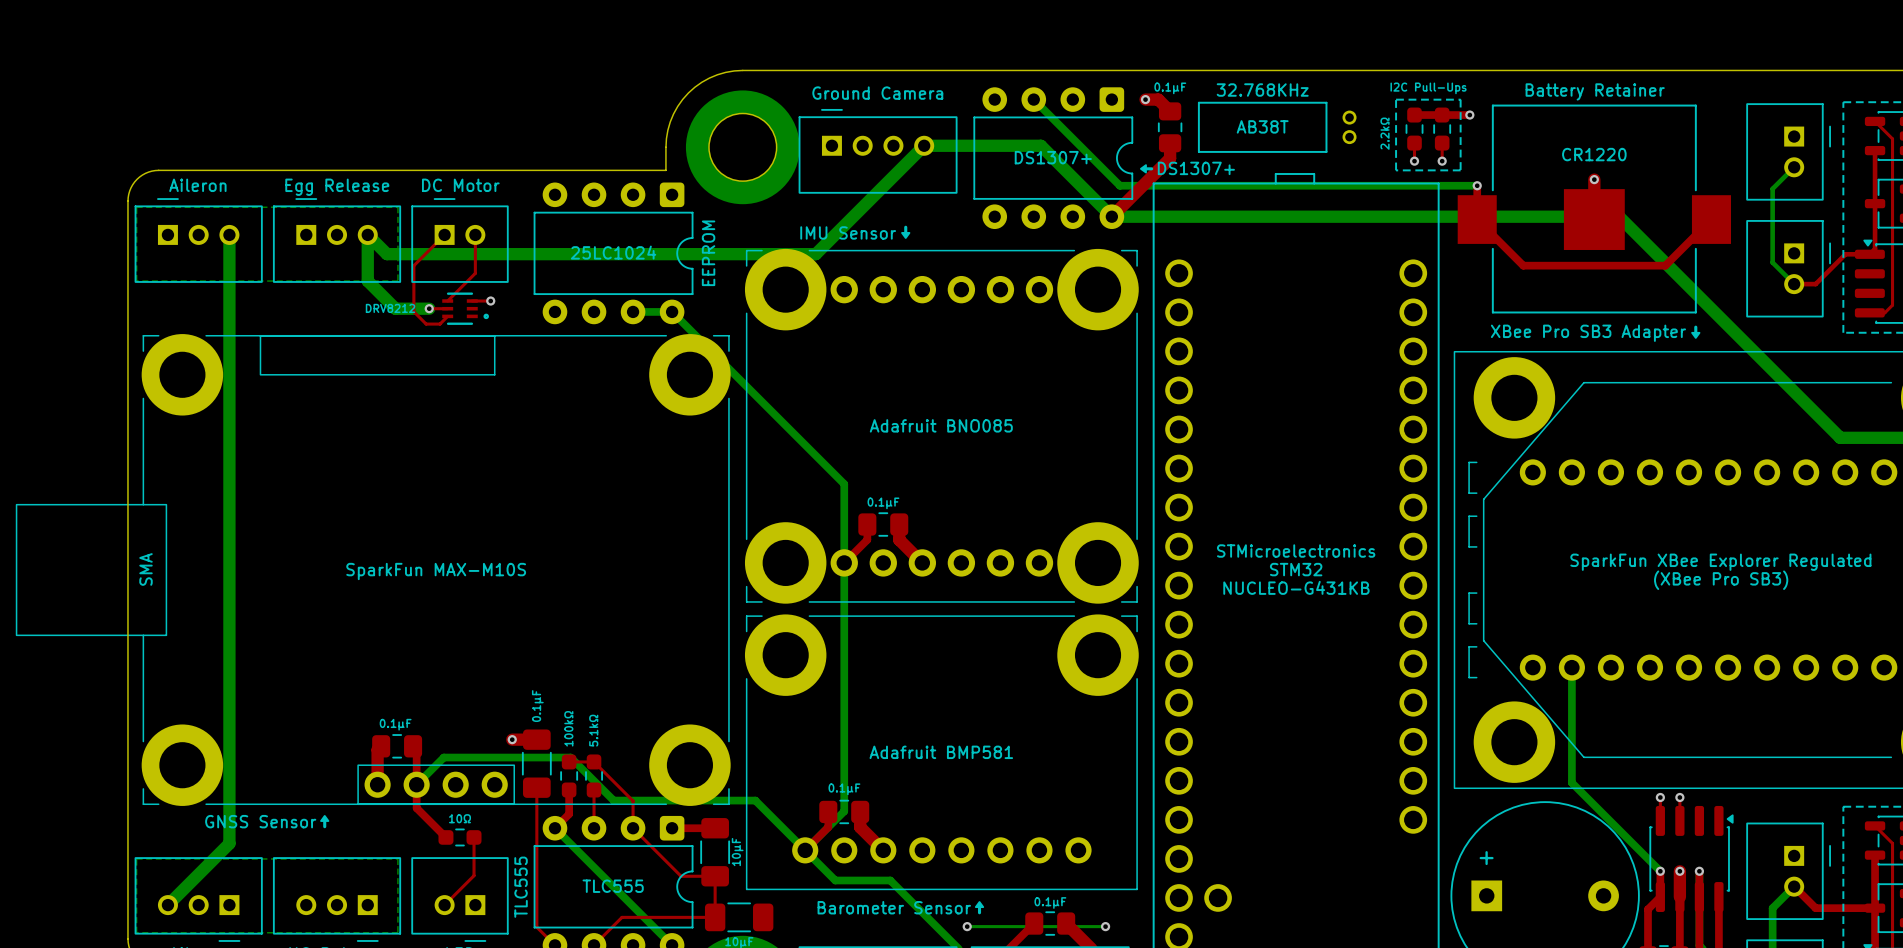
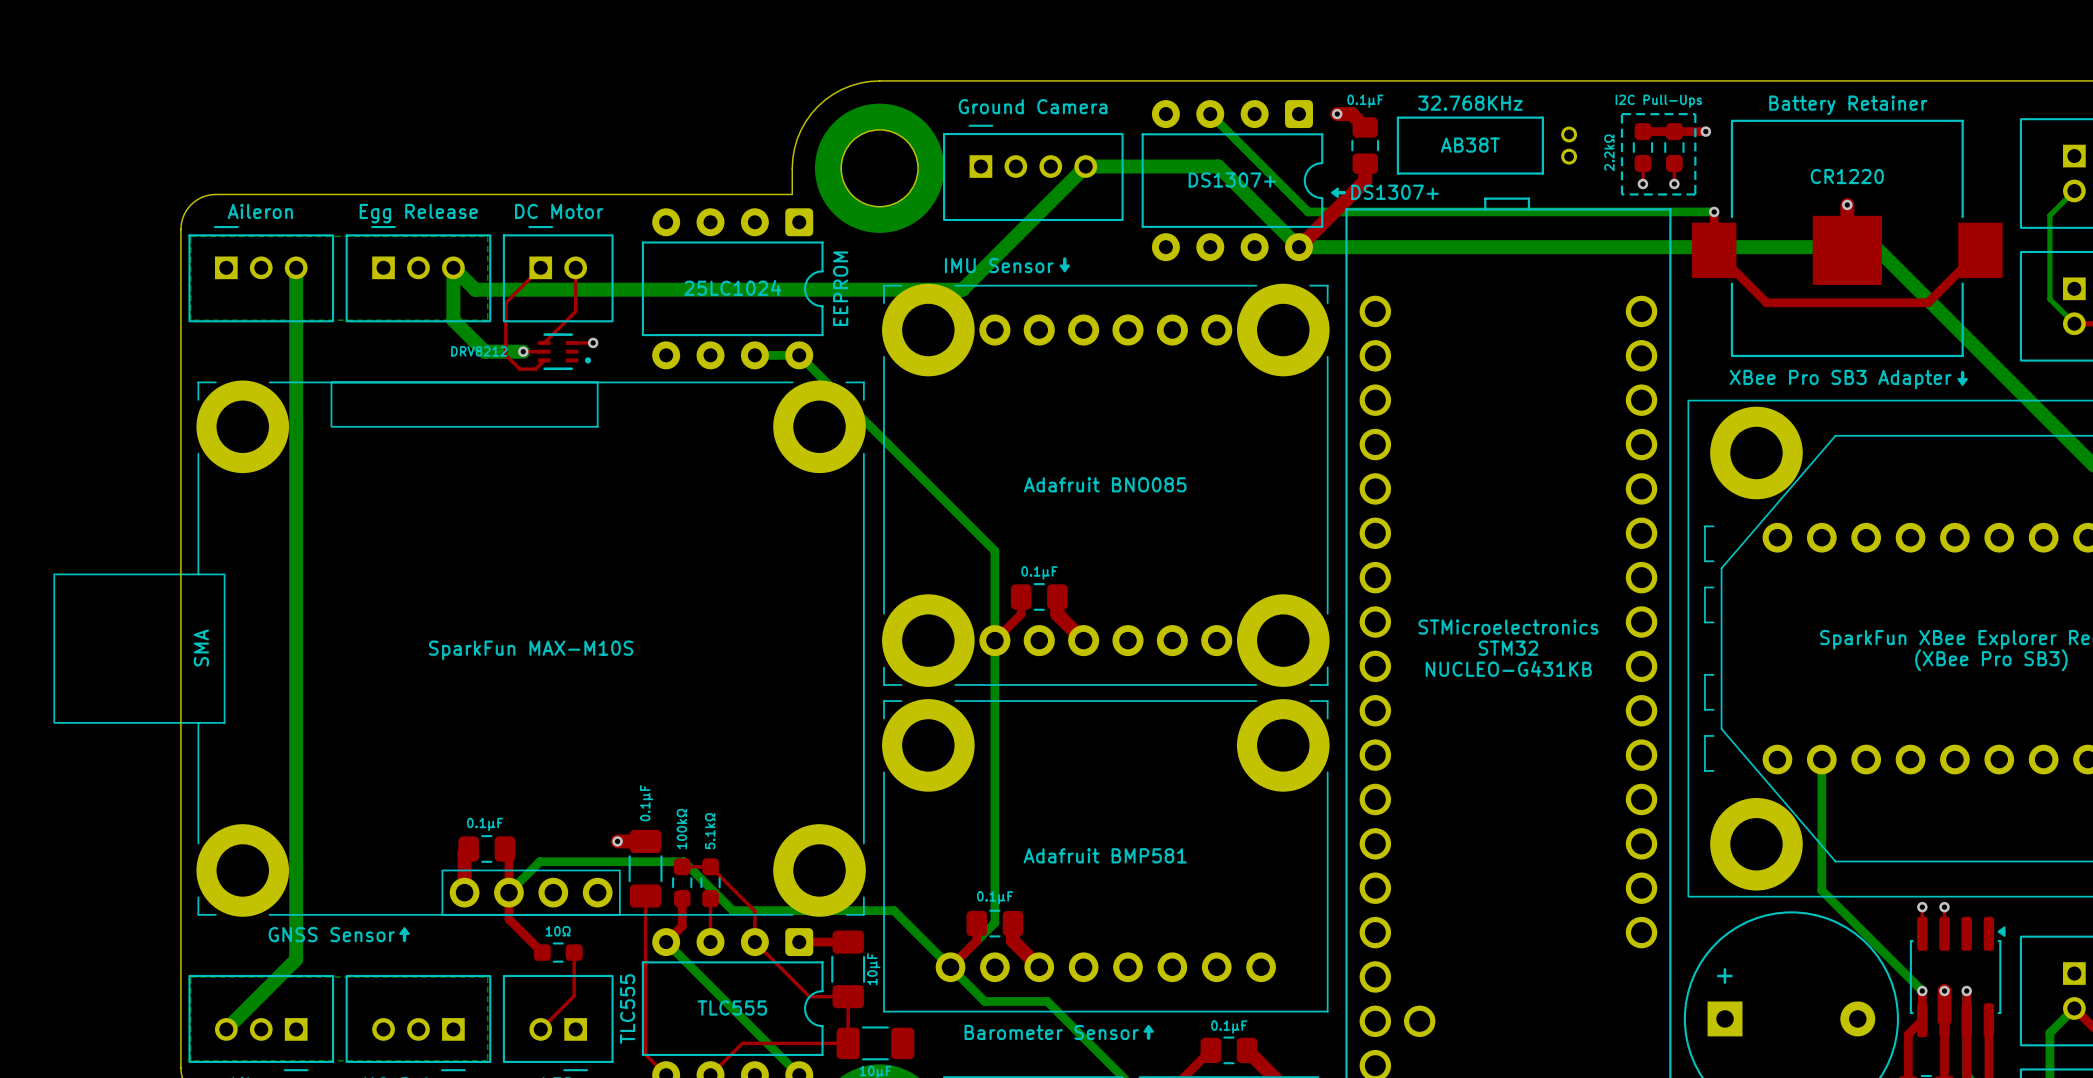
bottom track: (967, 926) (1105, 926) -> none
via: (967, 926) -> none
via: (1105, 926) -> none

